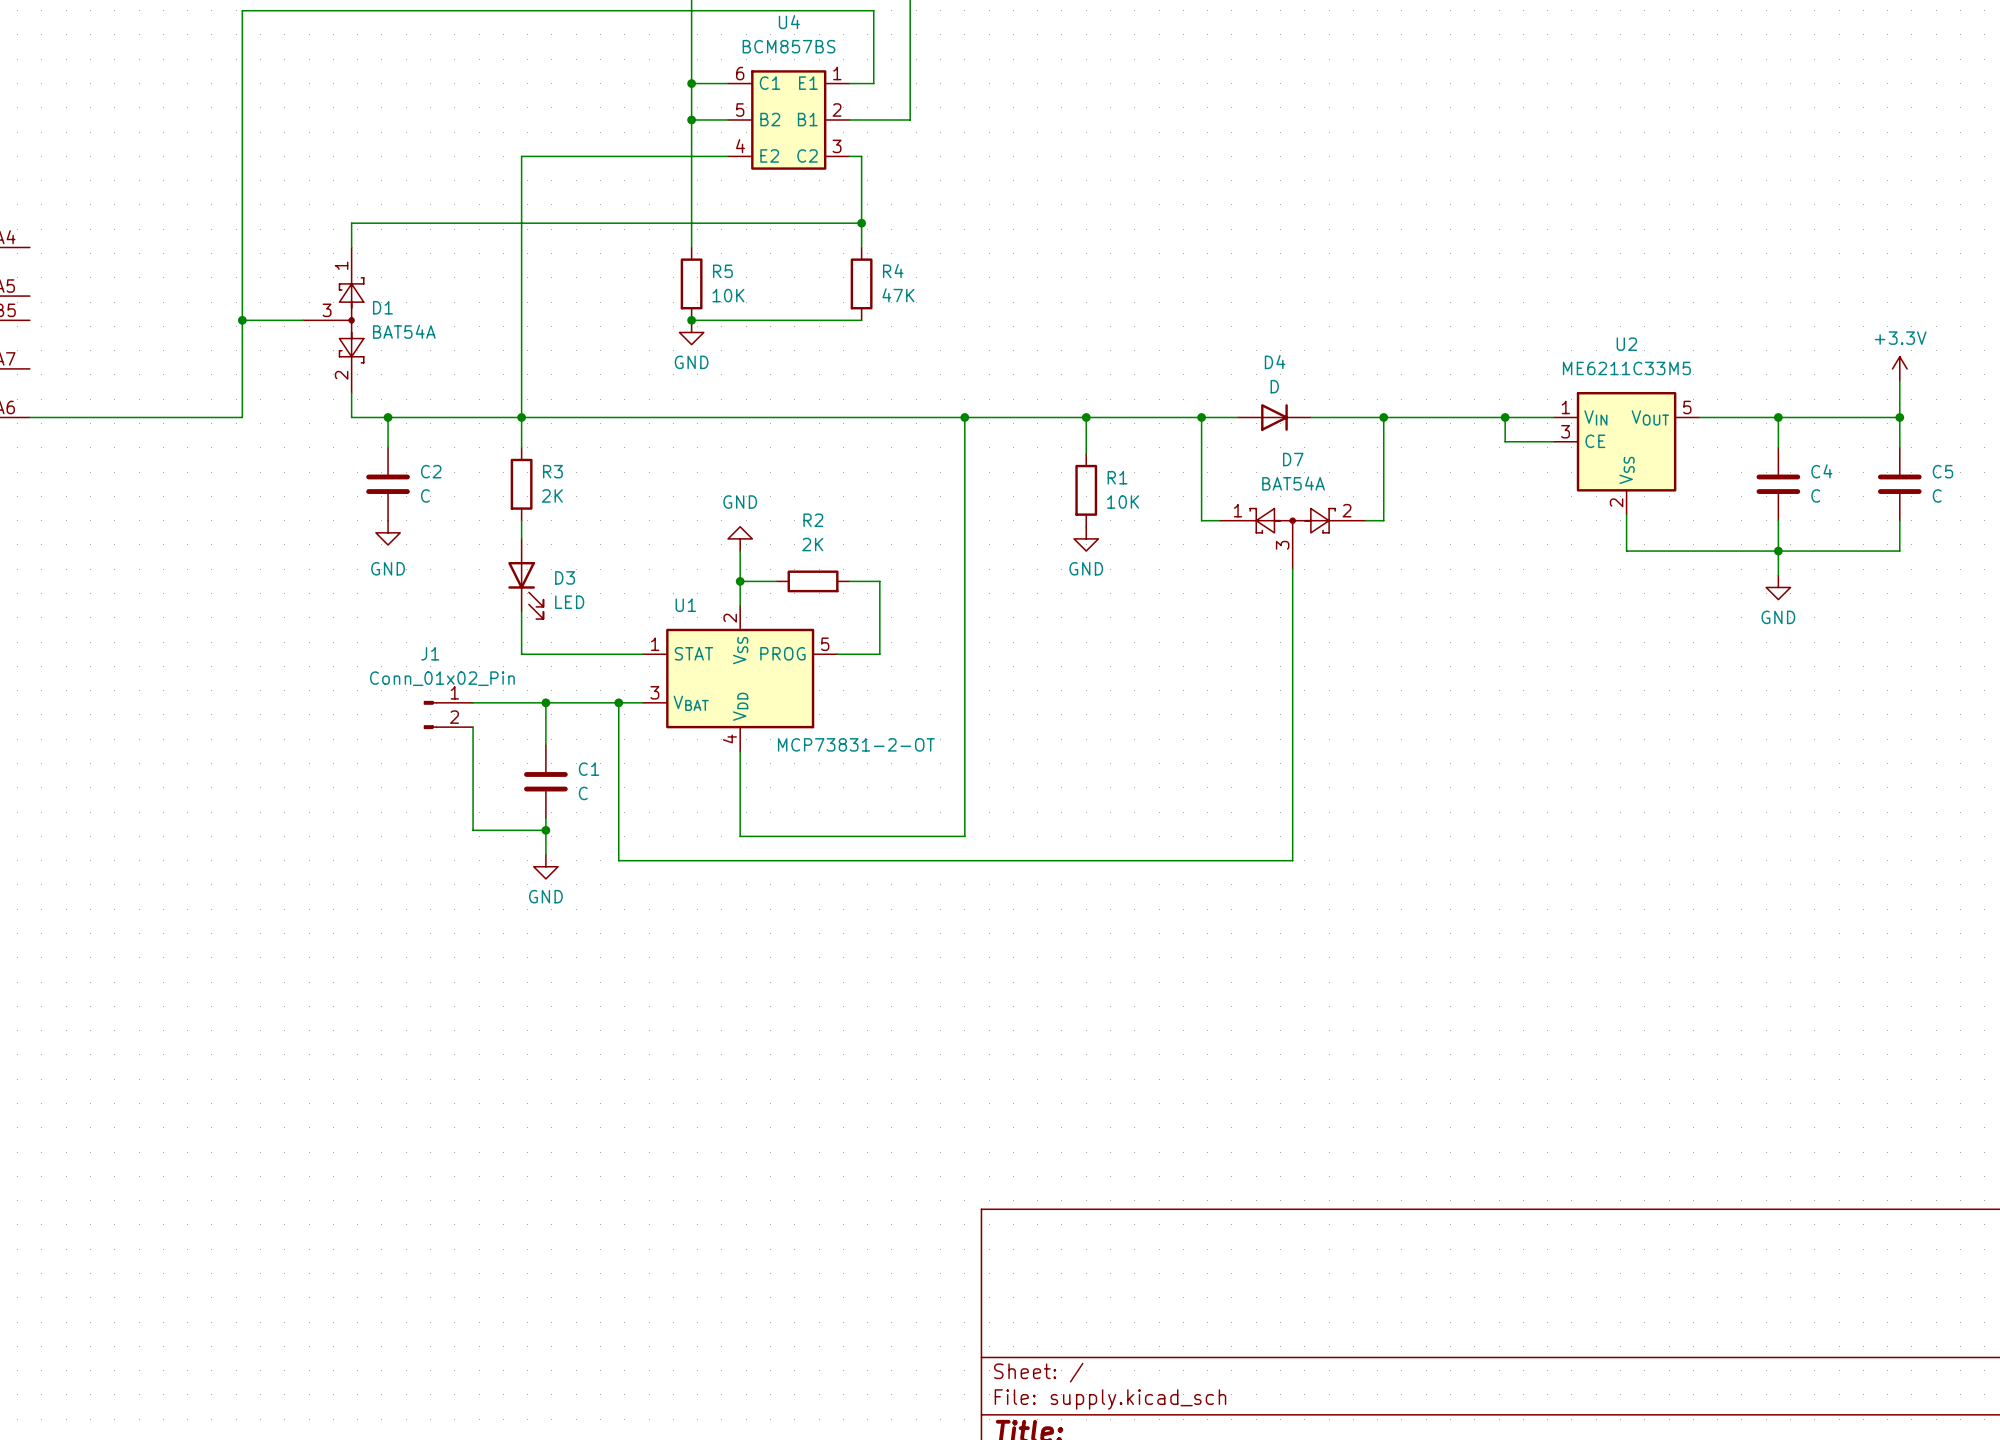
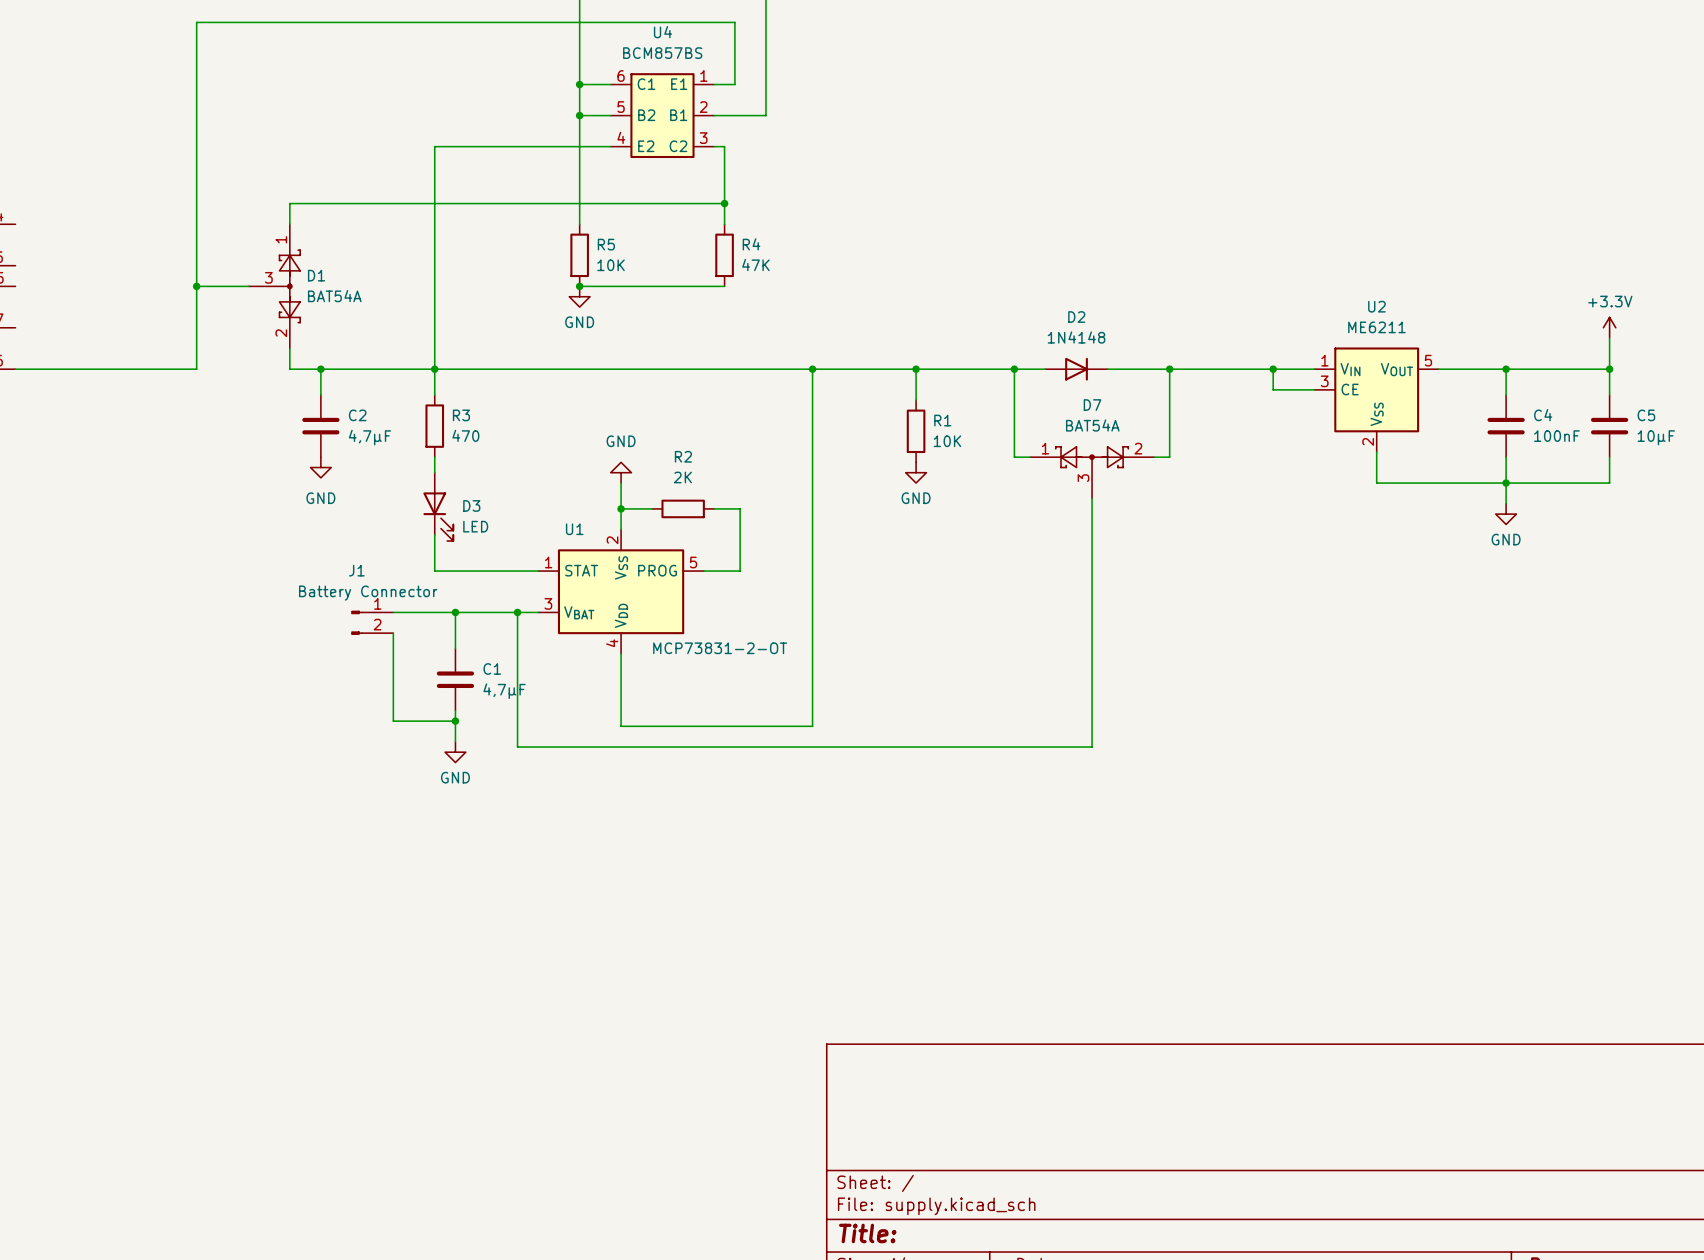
D4 name: D4 (1275, 362) -> D2 (1076, 317)
U2 value: ME6211C33M5 (1626, 368) -> ME6211 (1376, 327)
D4 value: D (1274, 386) -> 1N4148 (1076, 337)
C2 value: C (425, 495) -> 4,7µF (370, 437)
R3 value: 2K (552, 495) -> 470 (465, 435)
C4 value: C (1815, 495) -> 100nF (1556, 436)
C5 value: C (1937, 495) -> 10µF (1656, 437)
J1 value: Conn_01x02_Pin (442, 678) -> Battery Connector (368, 593)
C1 value: C (583, 793) -> 4,7µF (504, 691)

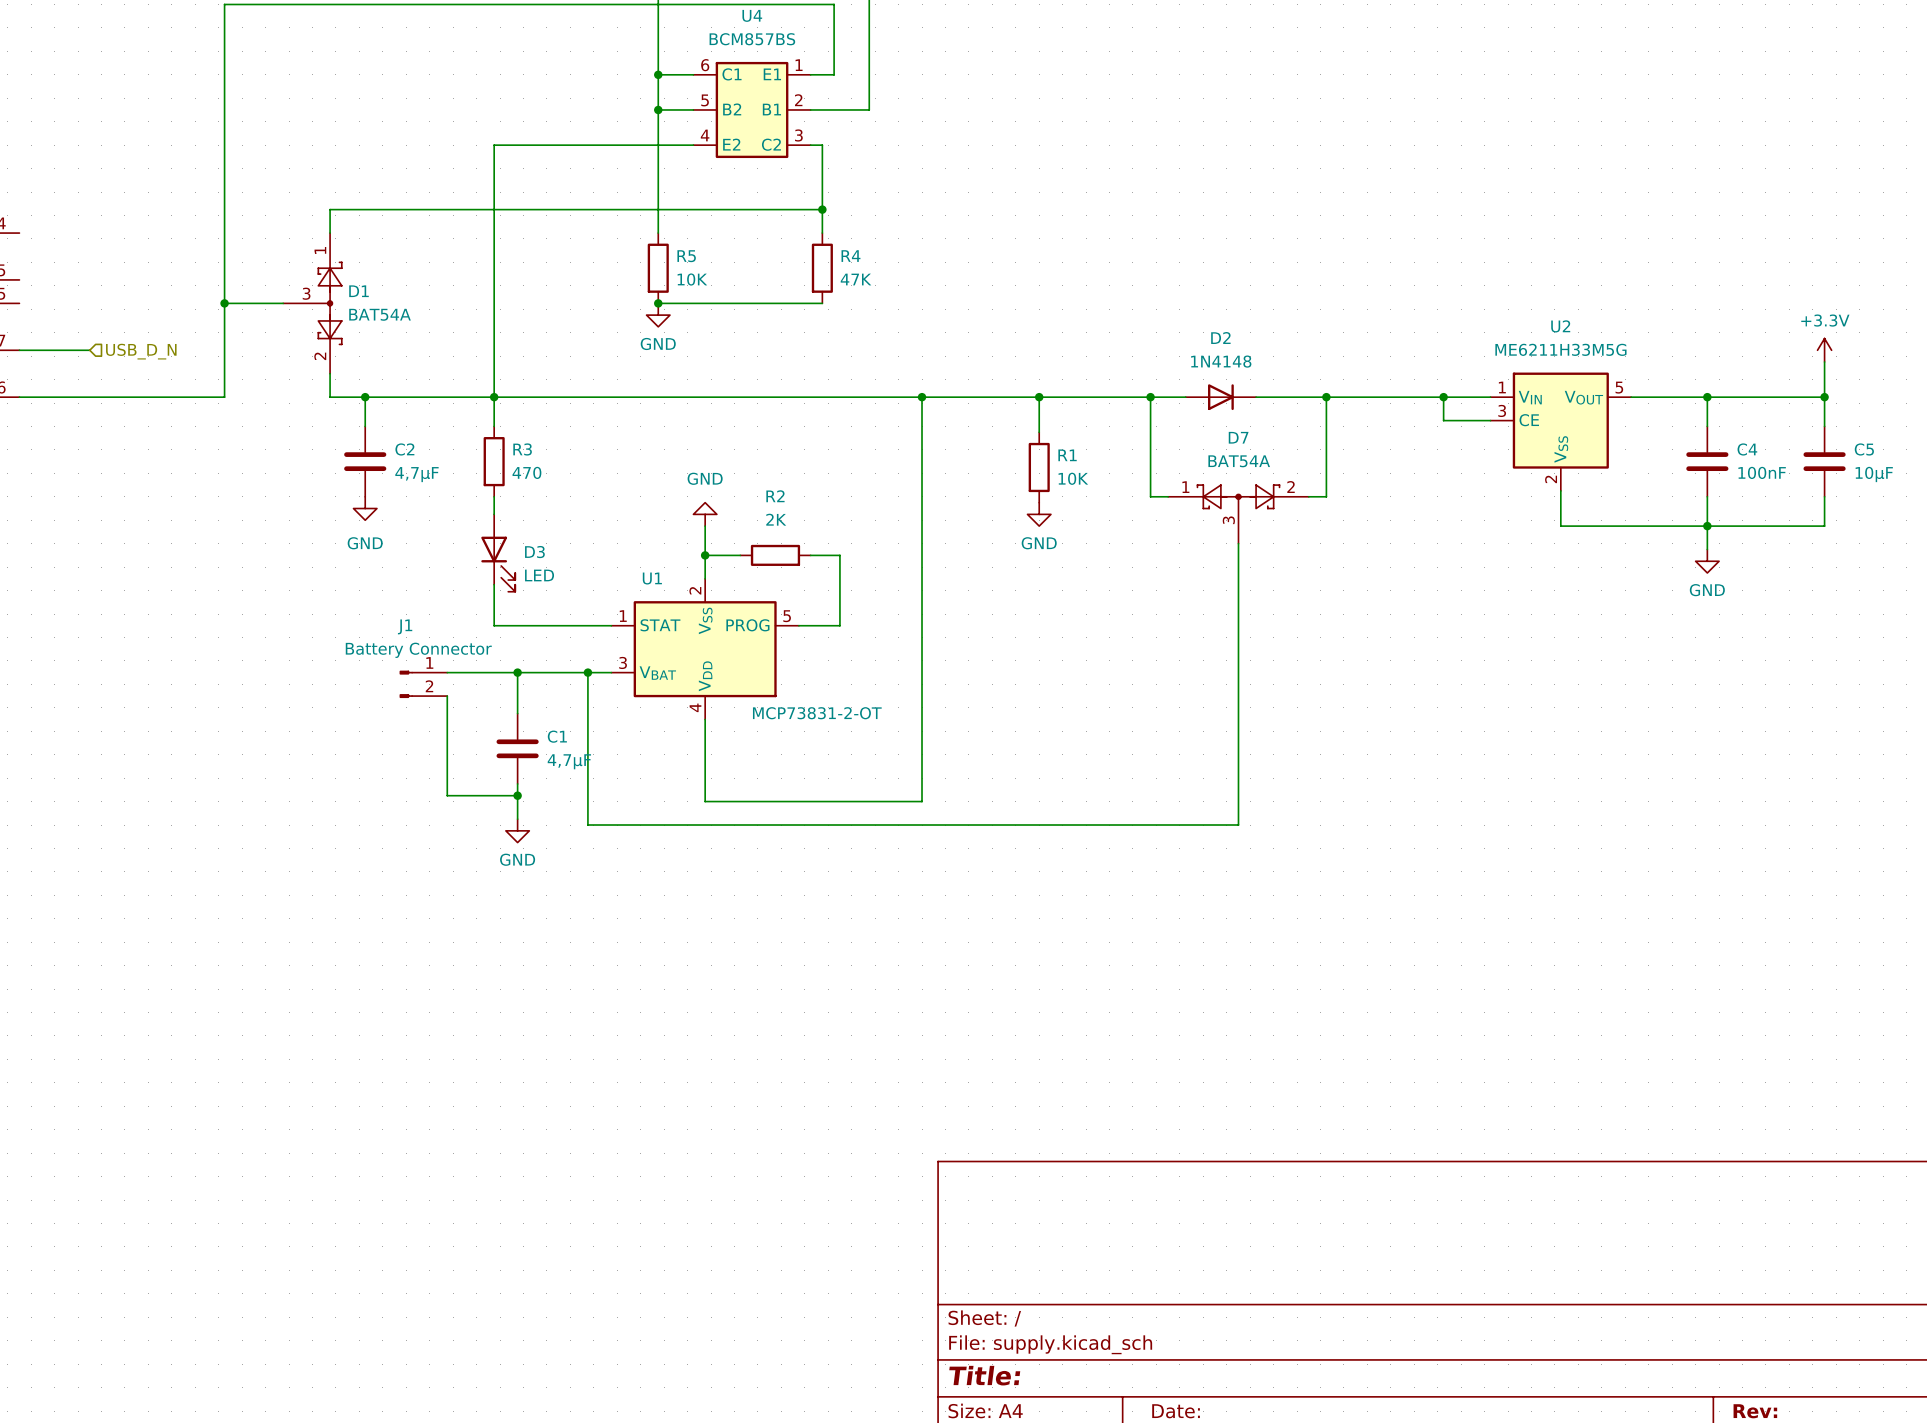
wire: none -> (19, 350) (89, 350)
hierarchical label: none -> USB_D_N (141, 351)
U2 value: ME6211 (1376, 327) -> ME6211H33M5G (1560, 349)

